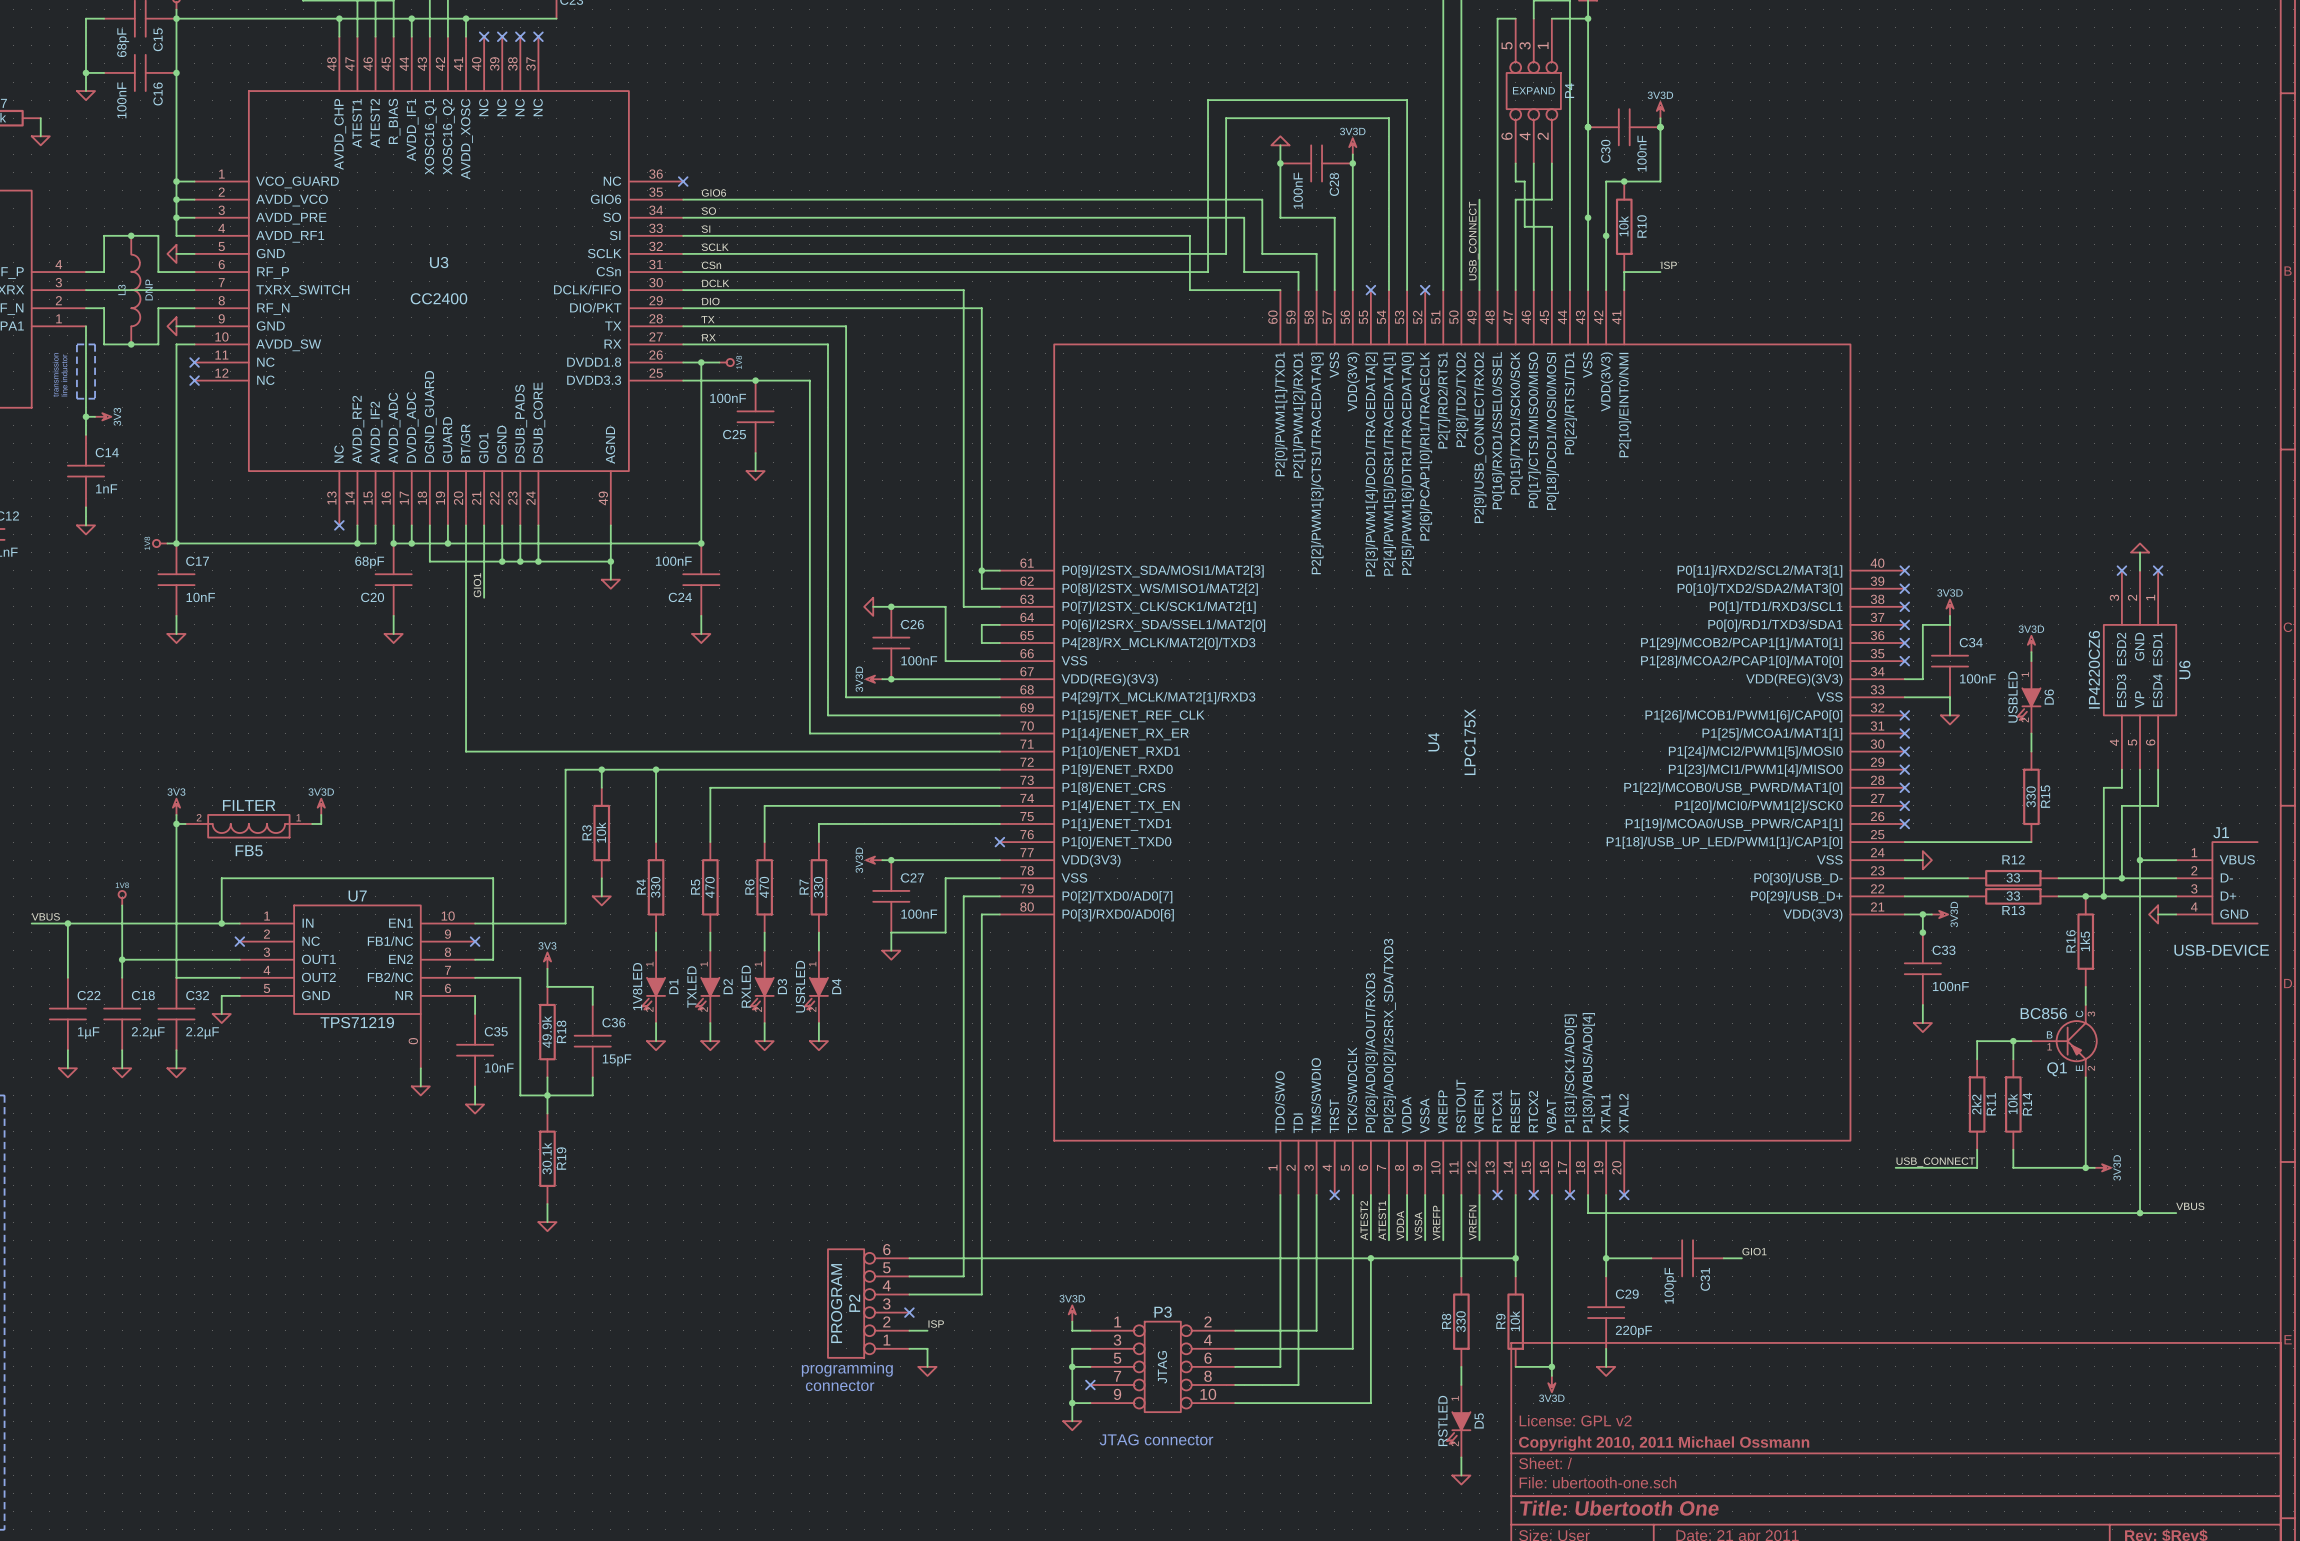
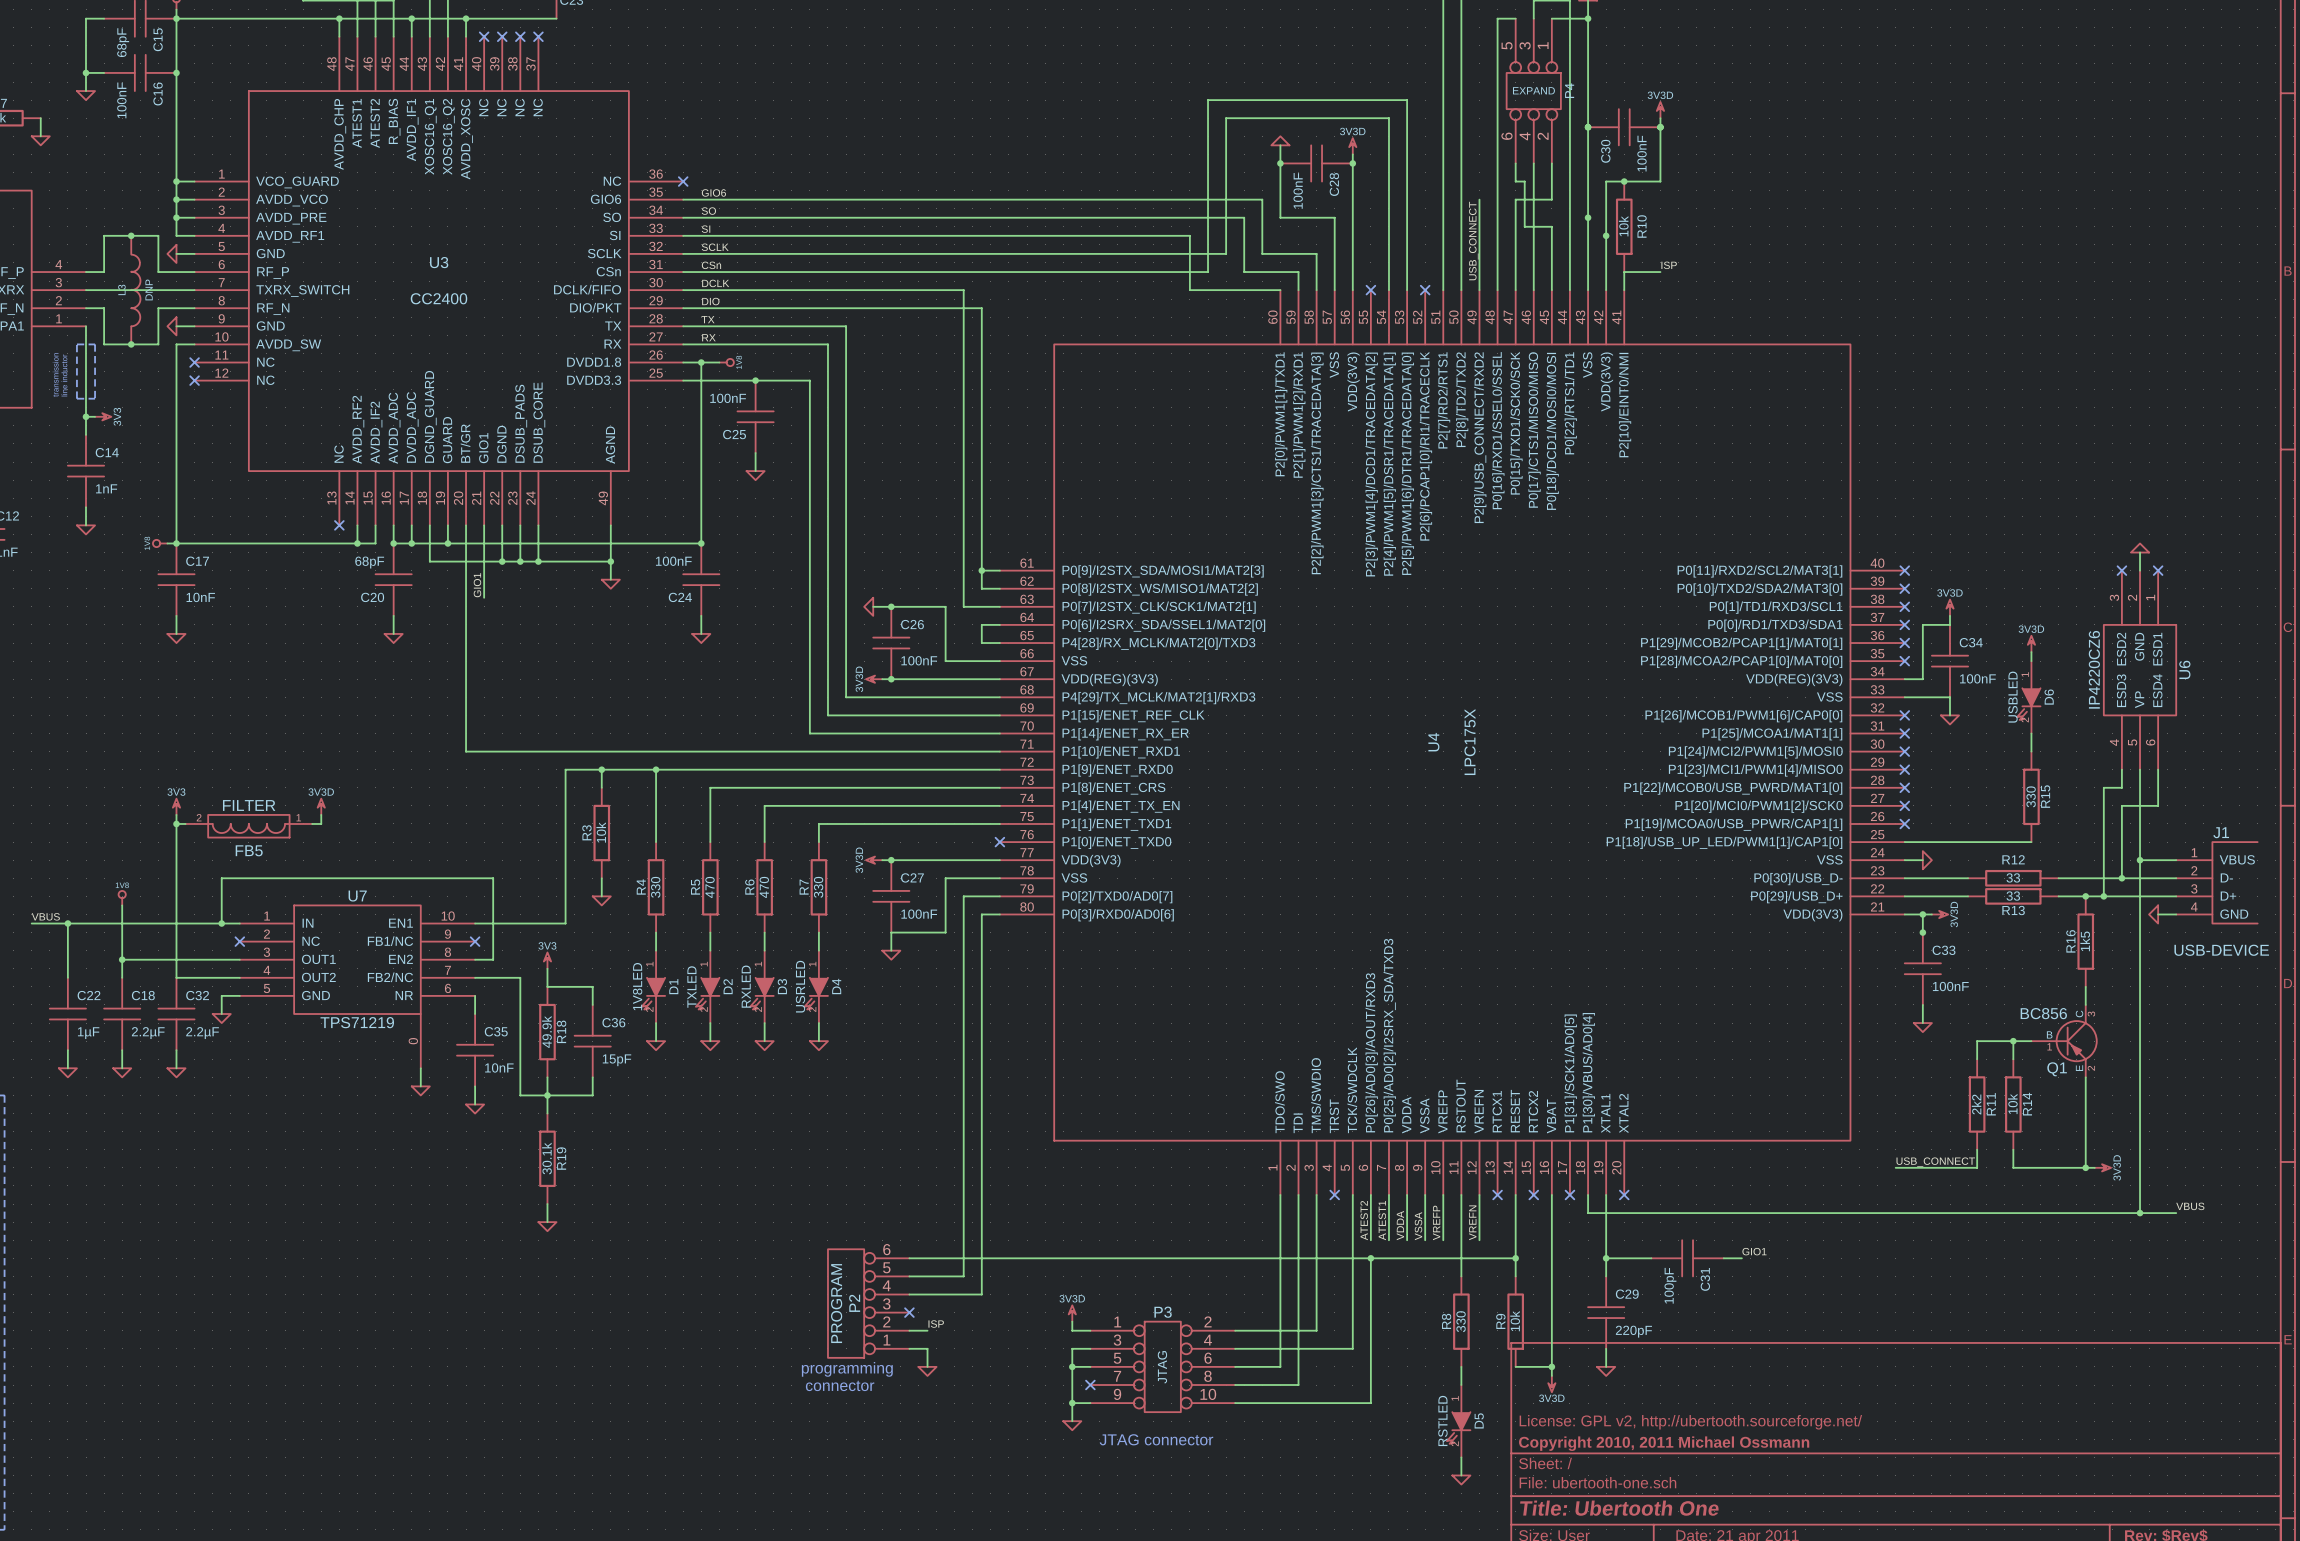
title block: License: GPL v2 (1575, 1420) -> License: GPL v2, http://ubertooth.sourceforge.net/ (1690, 1422)

